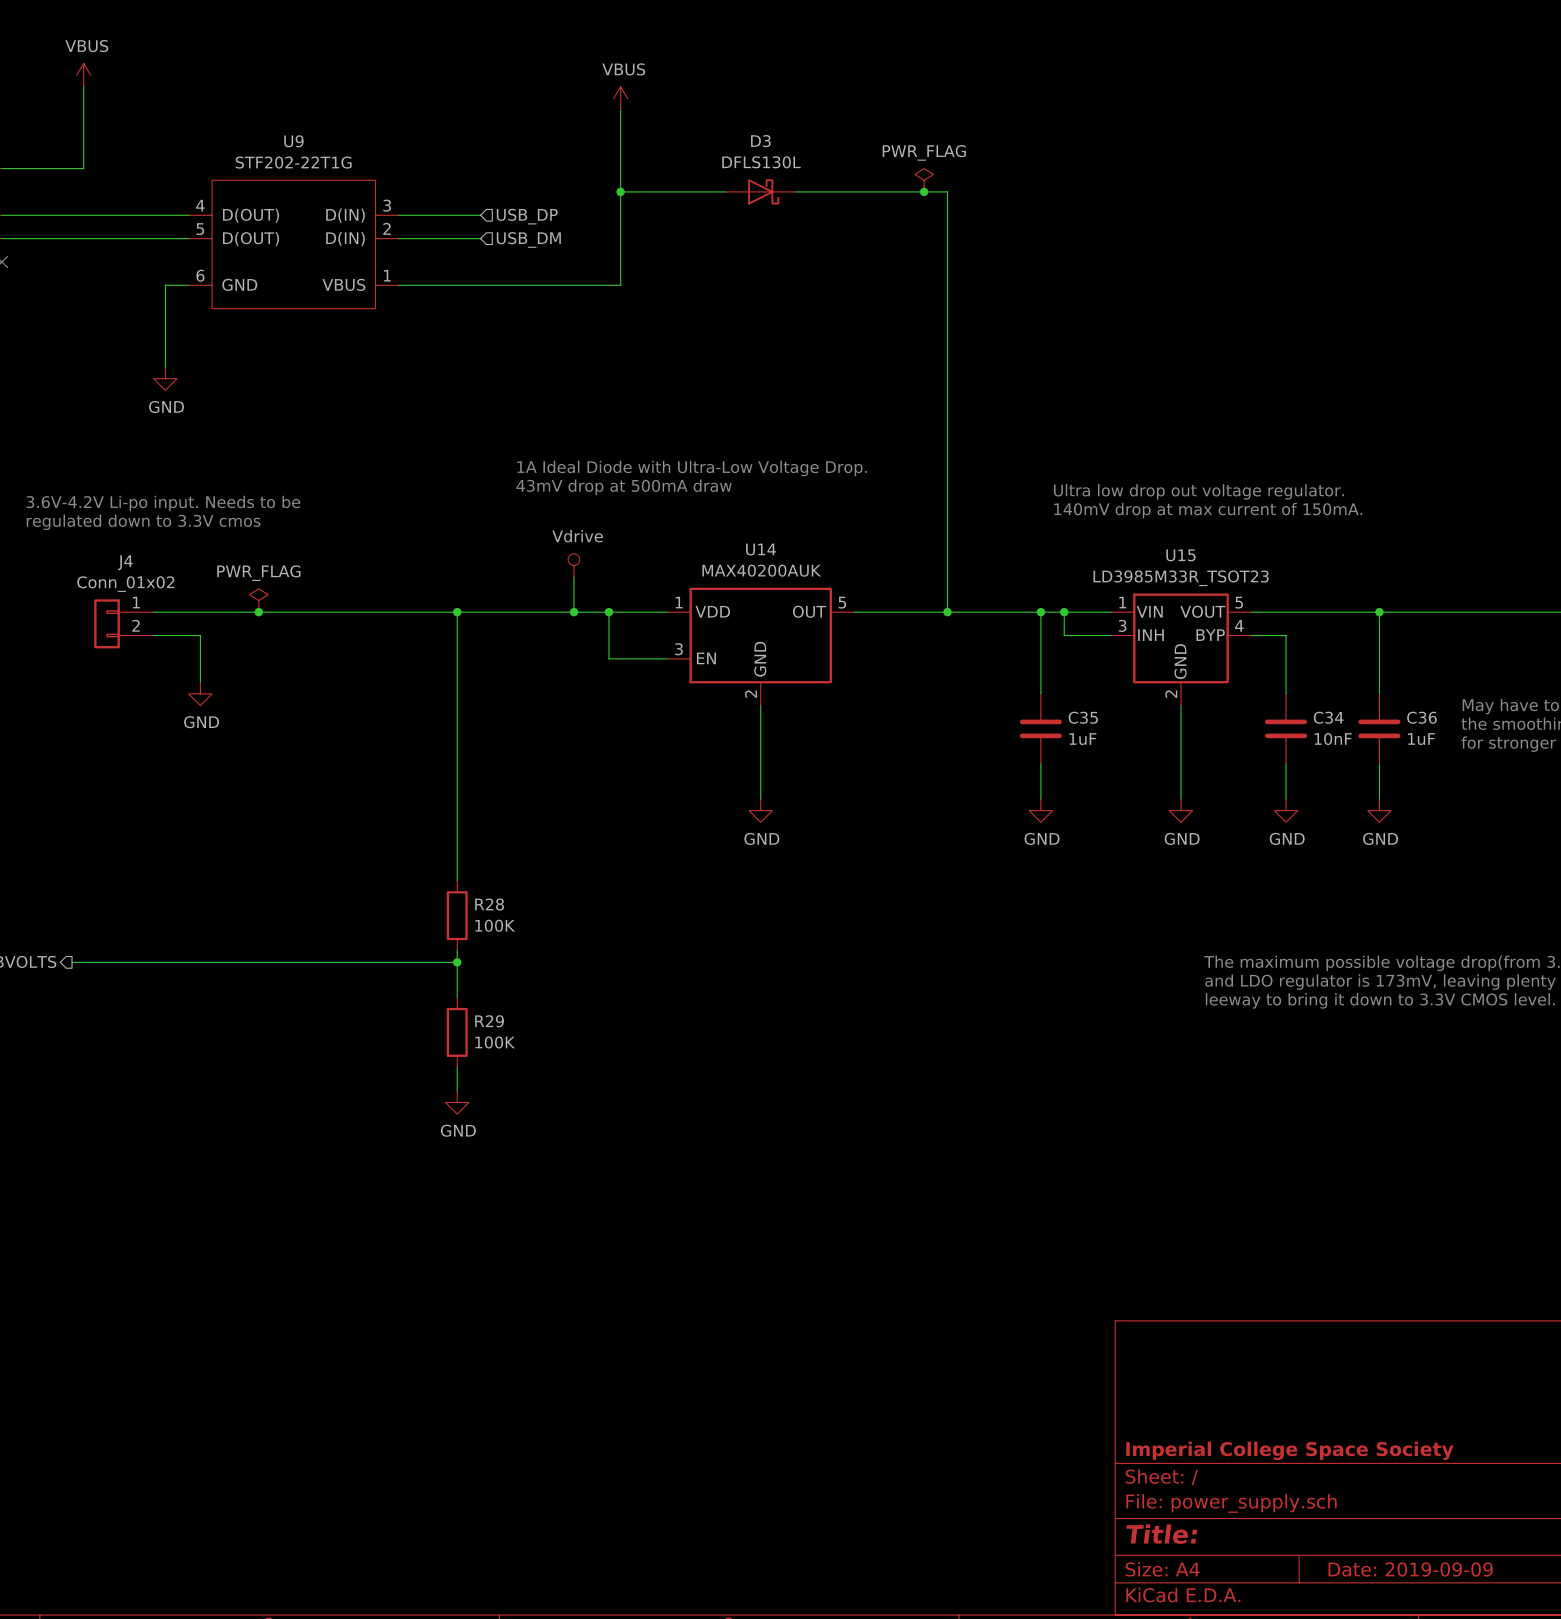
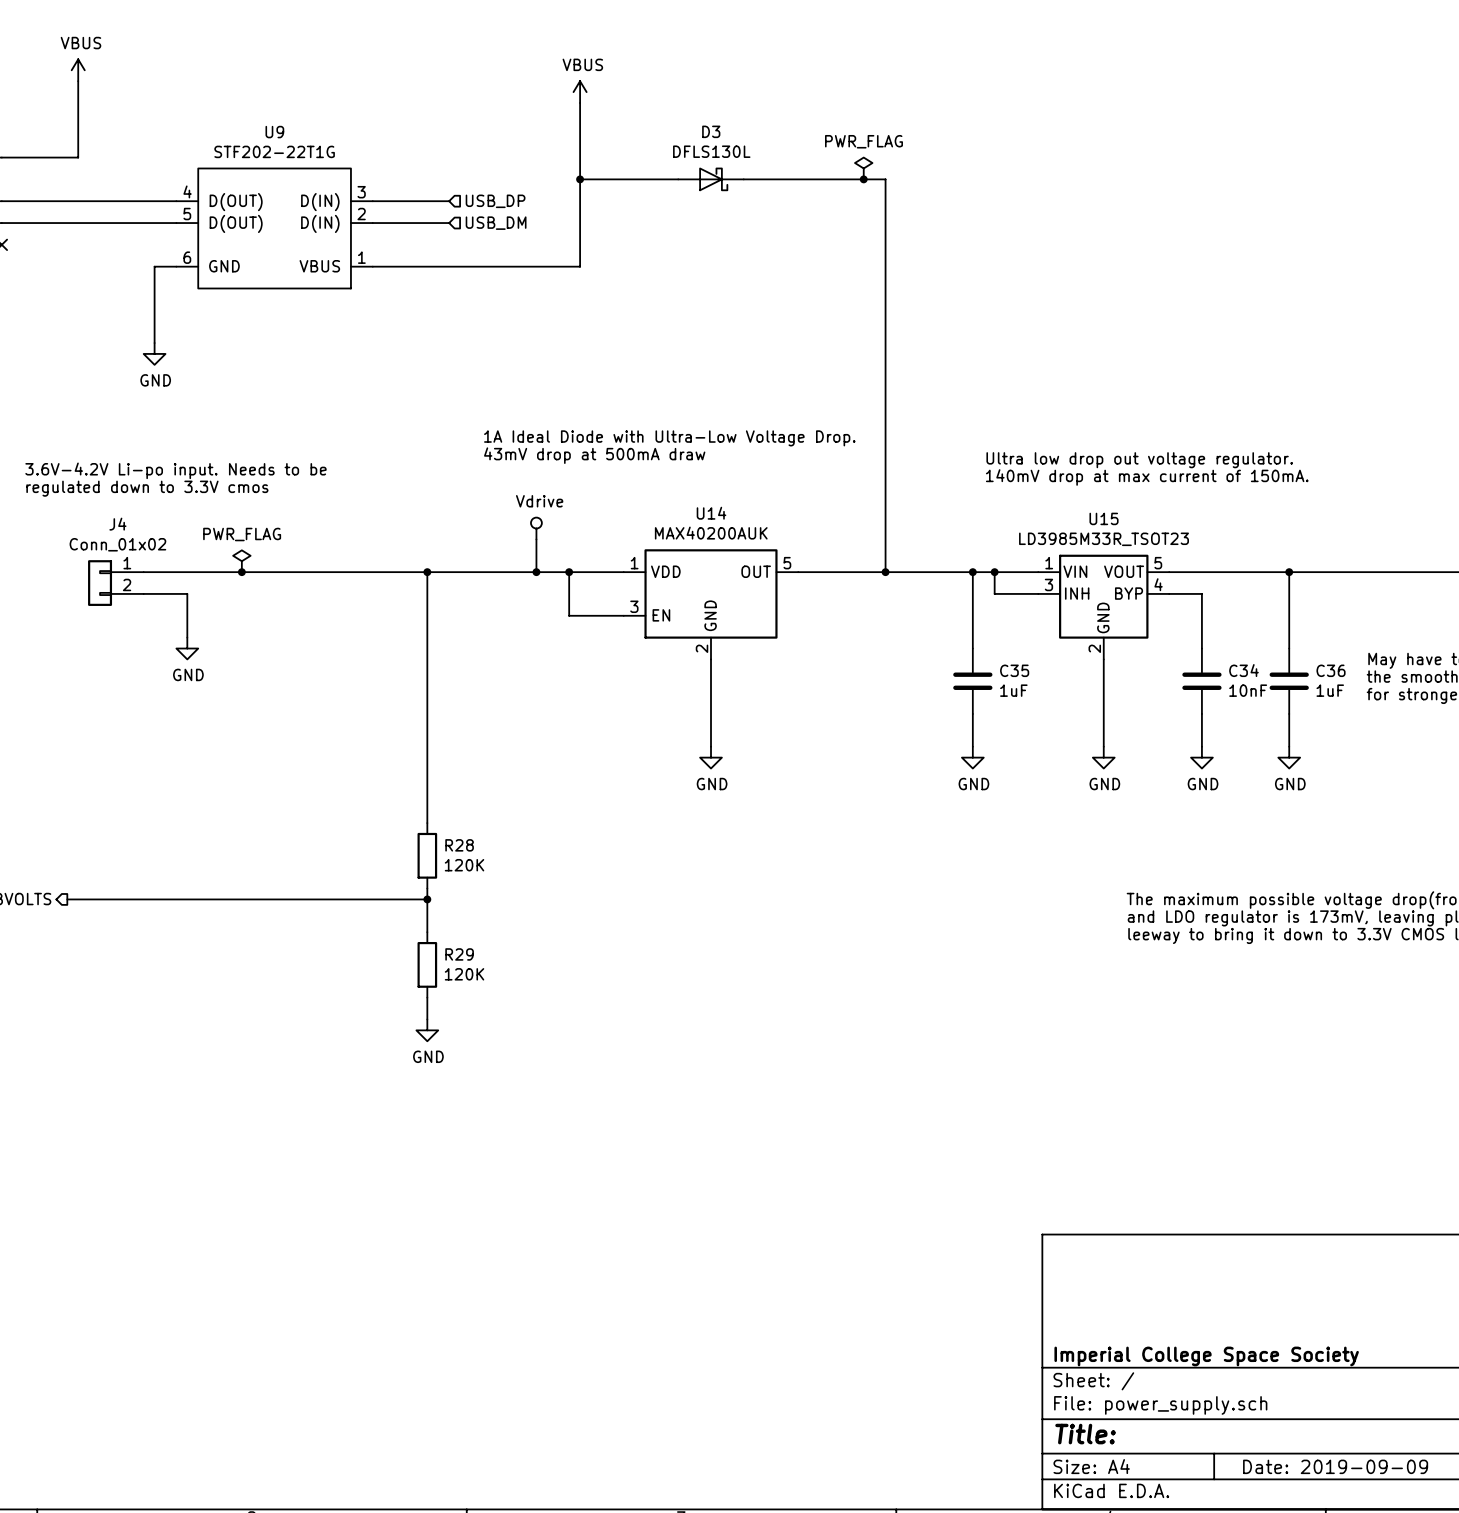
R28 value: 100K (495, 925) -> 120K (464, 865)
R29 value: 100K (495, 1042) -> 120K (464, 974)

